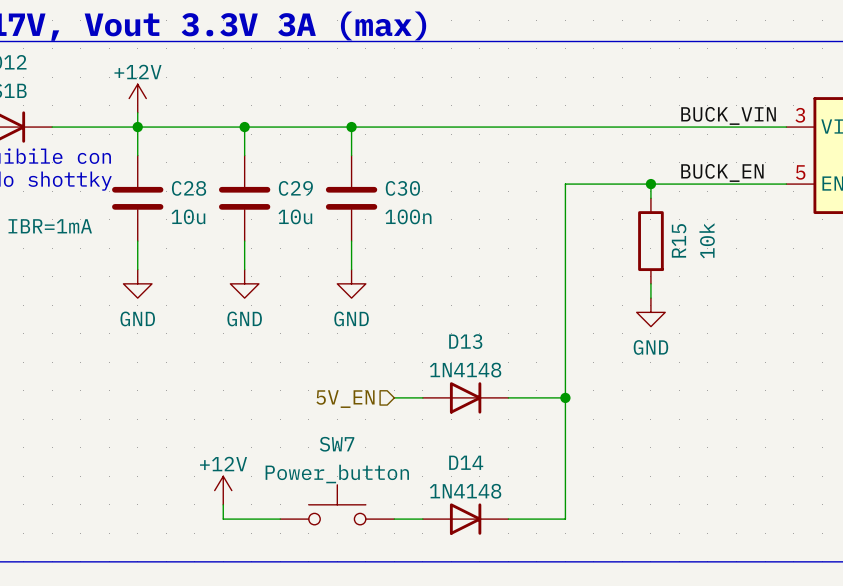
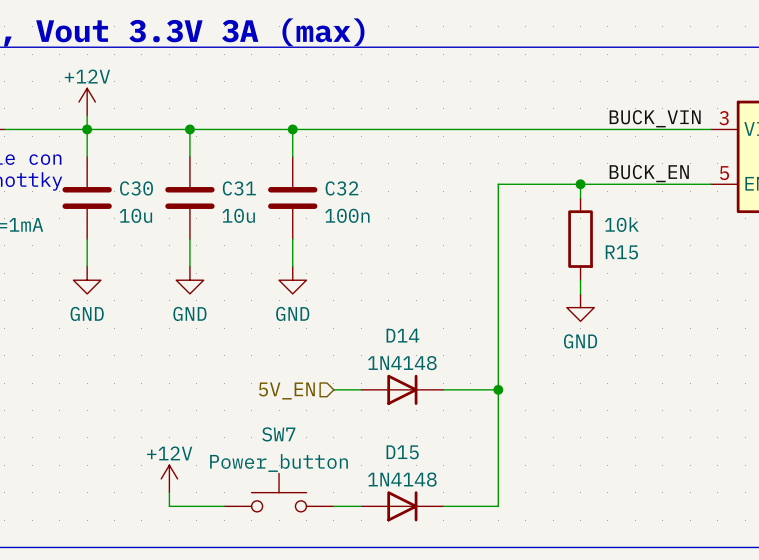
C28 name: C28 (189, 188) -> C30 (136, 188)
C29 name: C29 (295, 188) -> C31 (239, 188)
C30 name: C30 (402, 188) -> C32 (341, 188)
R15 name rotation: 0° (679, 240) -> 90° clockwise (621, 252)
R15 value rotation: 0° (707, 240) -> 90° clockwise (621, 224)
D13 name: D13 (465, 341) -> D14 (402, 335)
D14 name: D14 (466, 462) -> D15 (402, 452)

